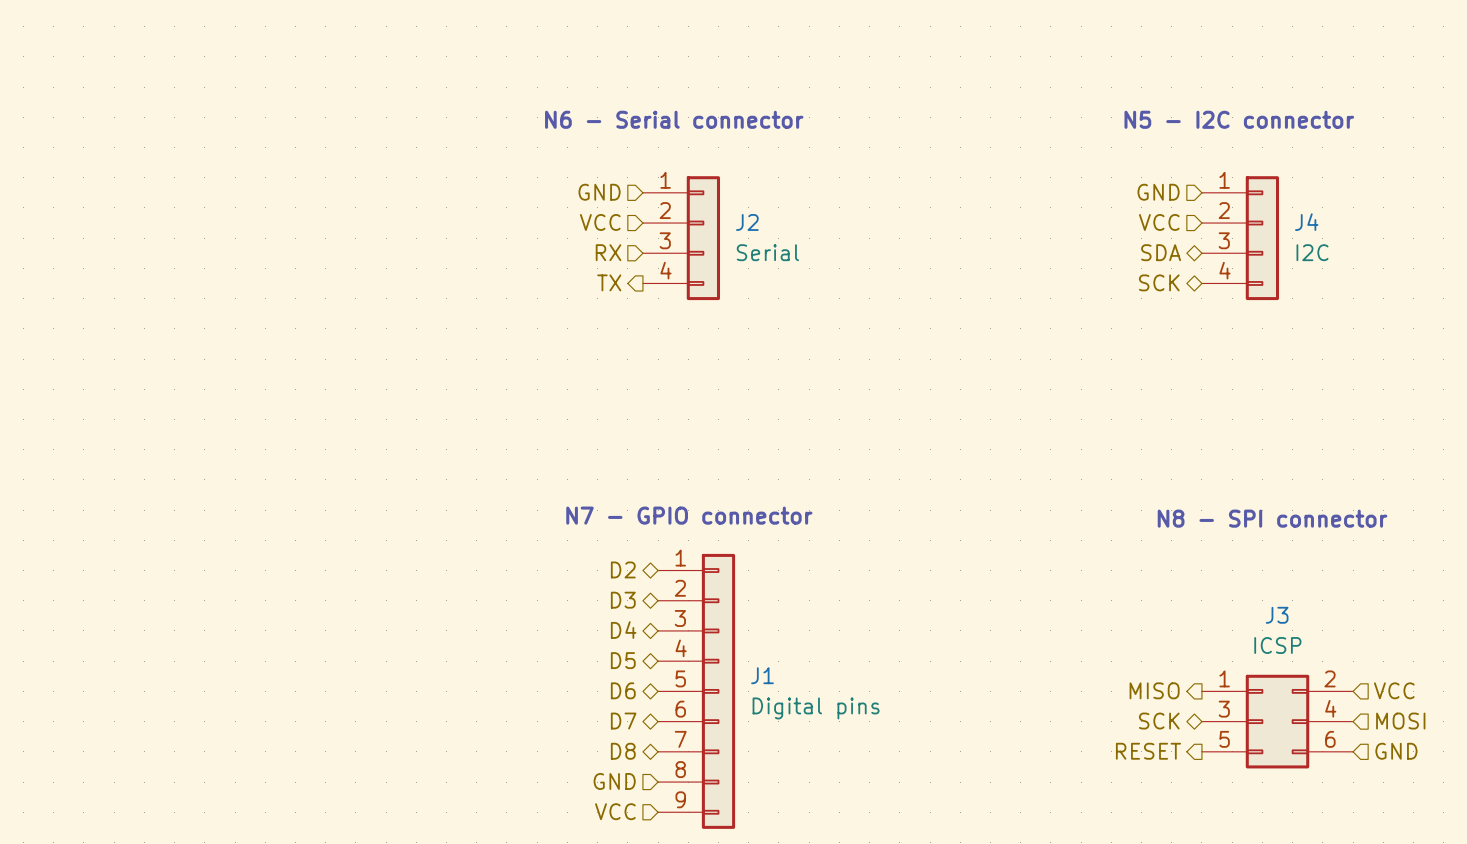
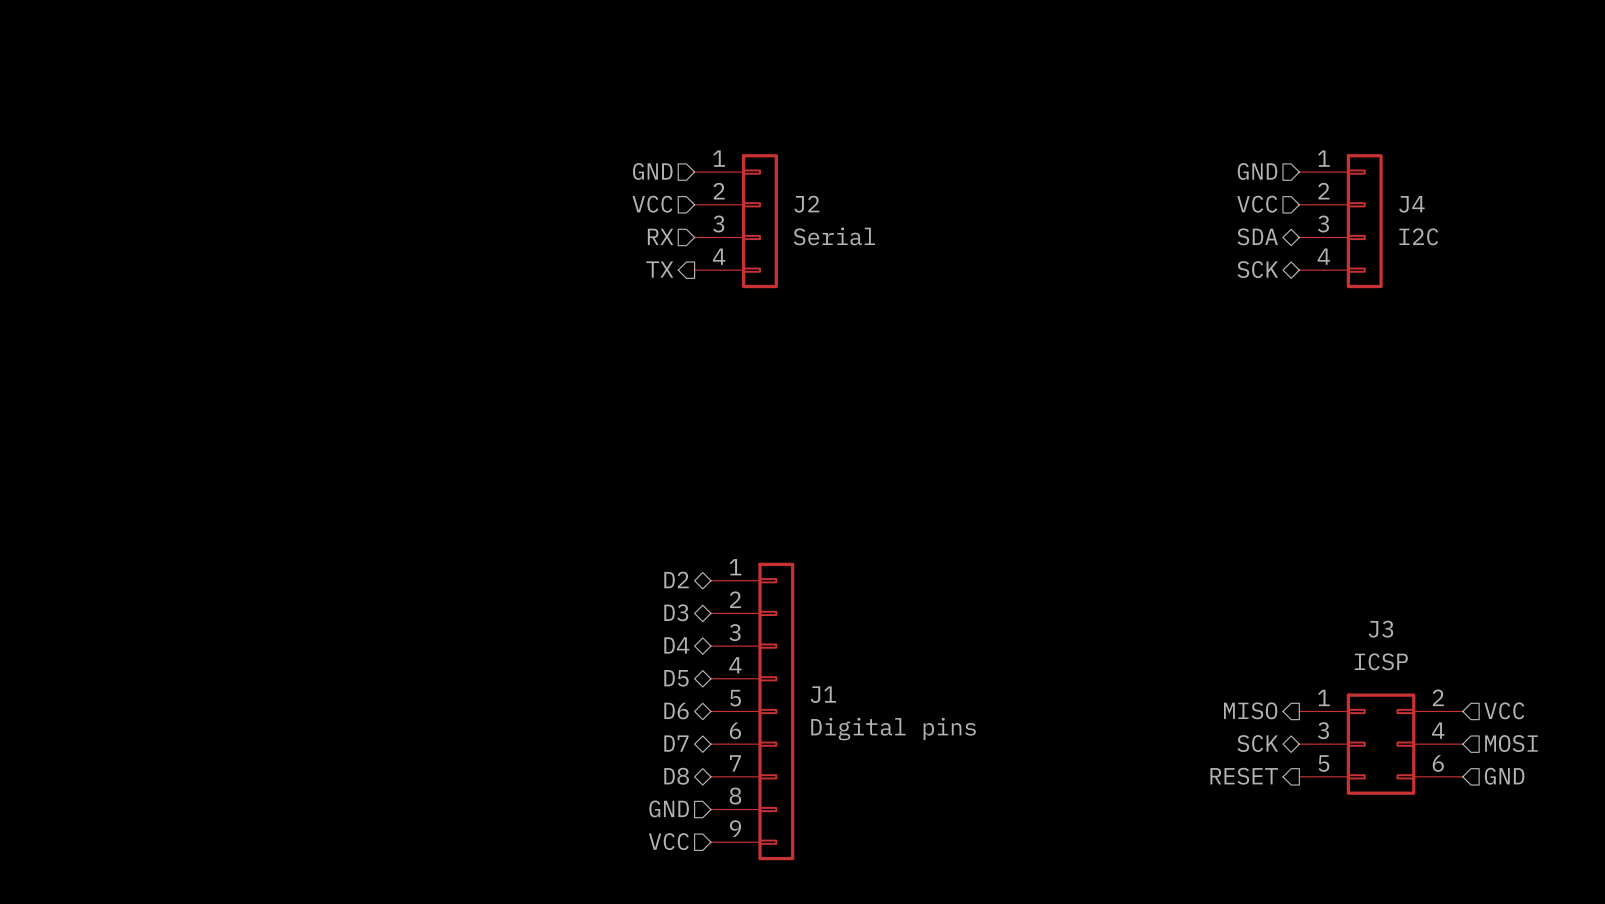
text: N6 - Serial connector (674, 119) -> none
text: N5 - I2C connector (1239, 119) -> none
text: N7 - GPIO connector (689, 515) -> none
text: N8 - SPI connector (1272, 518) -> none

